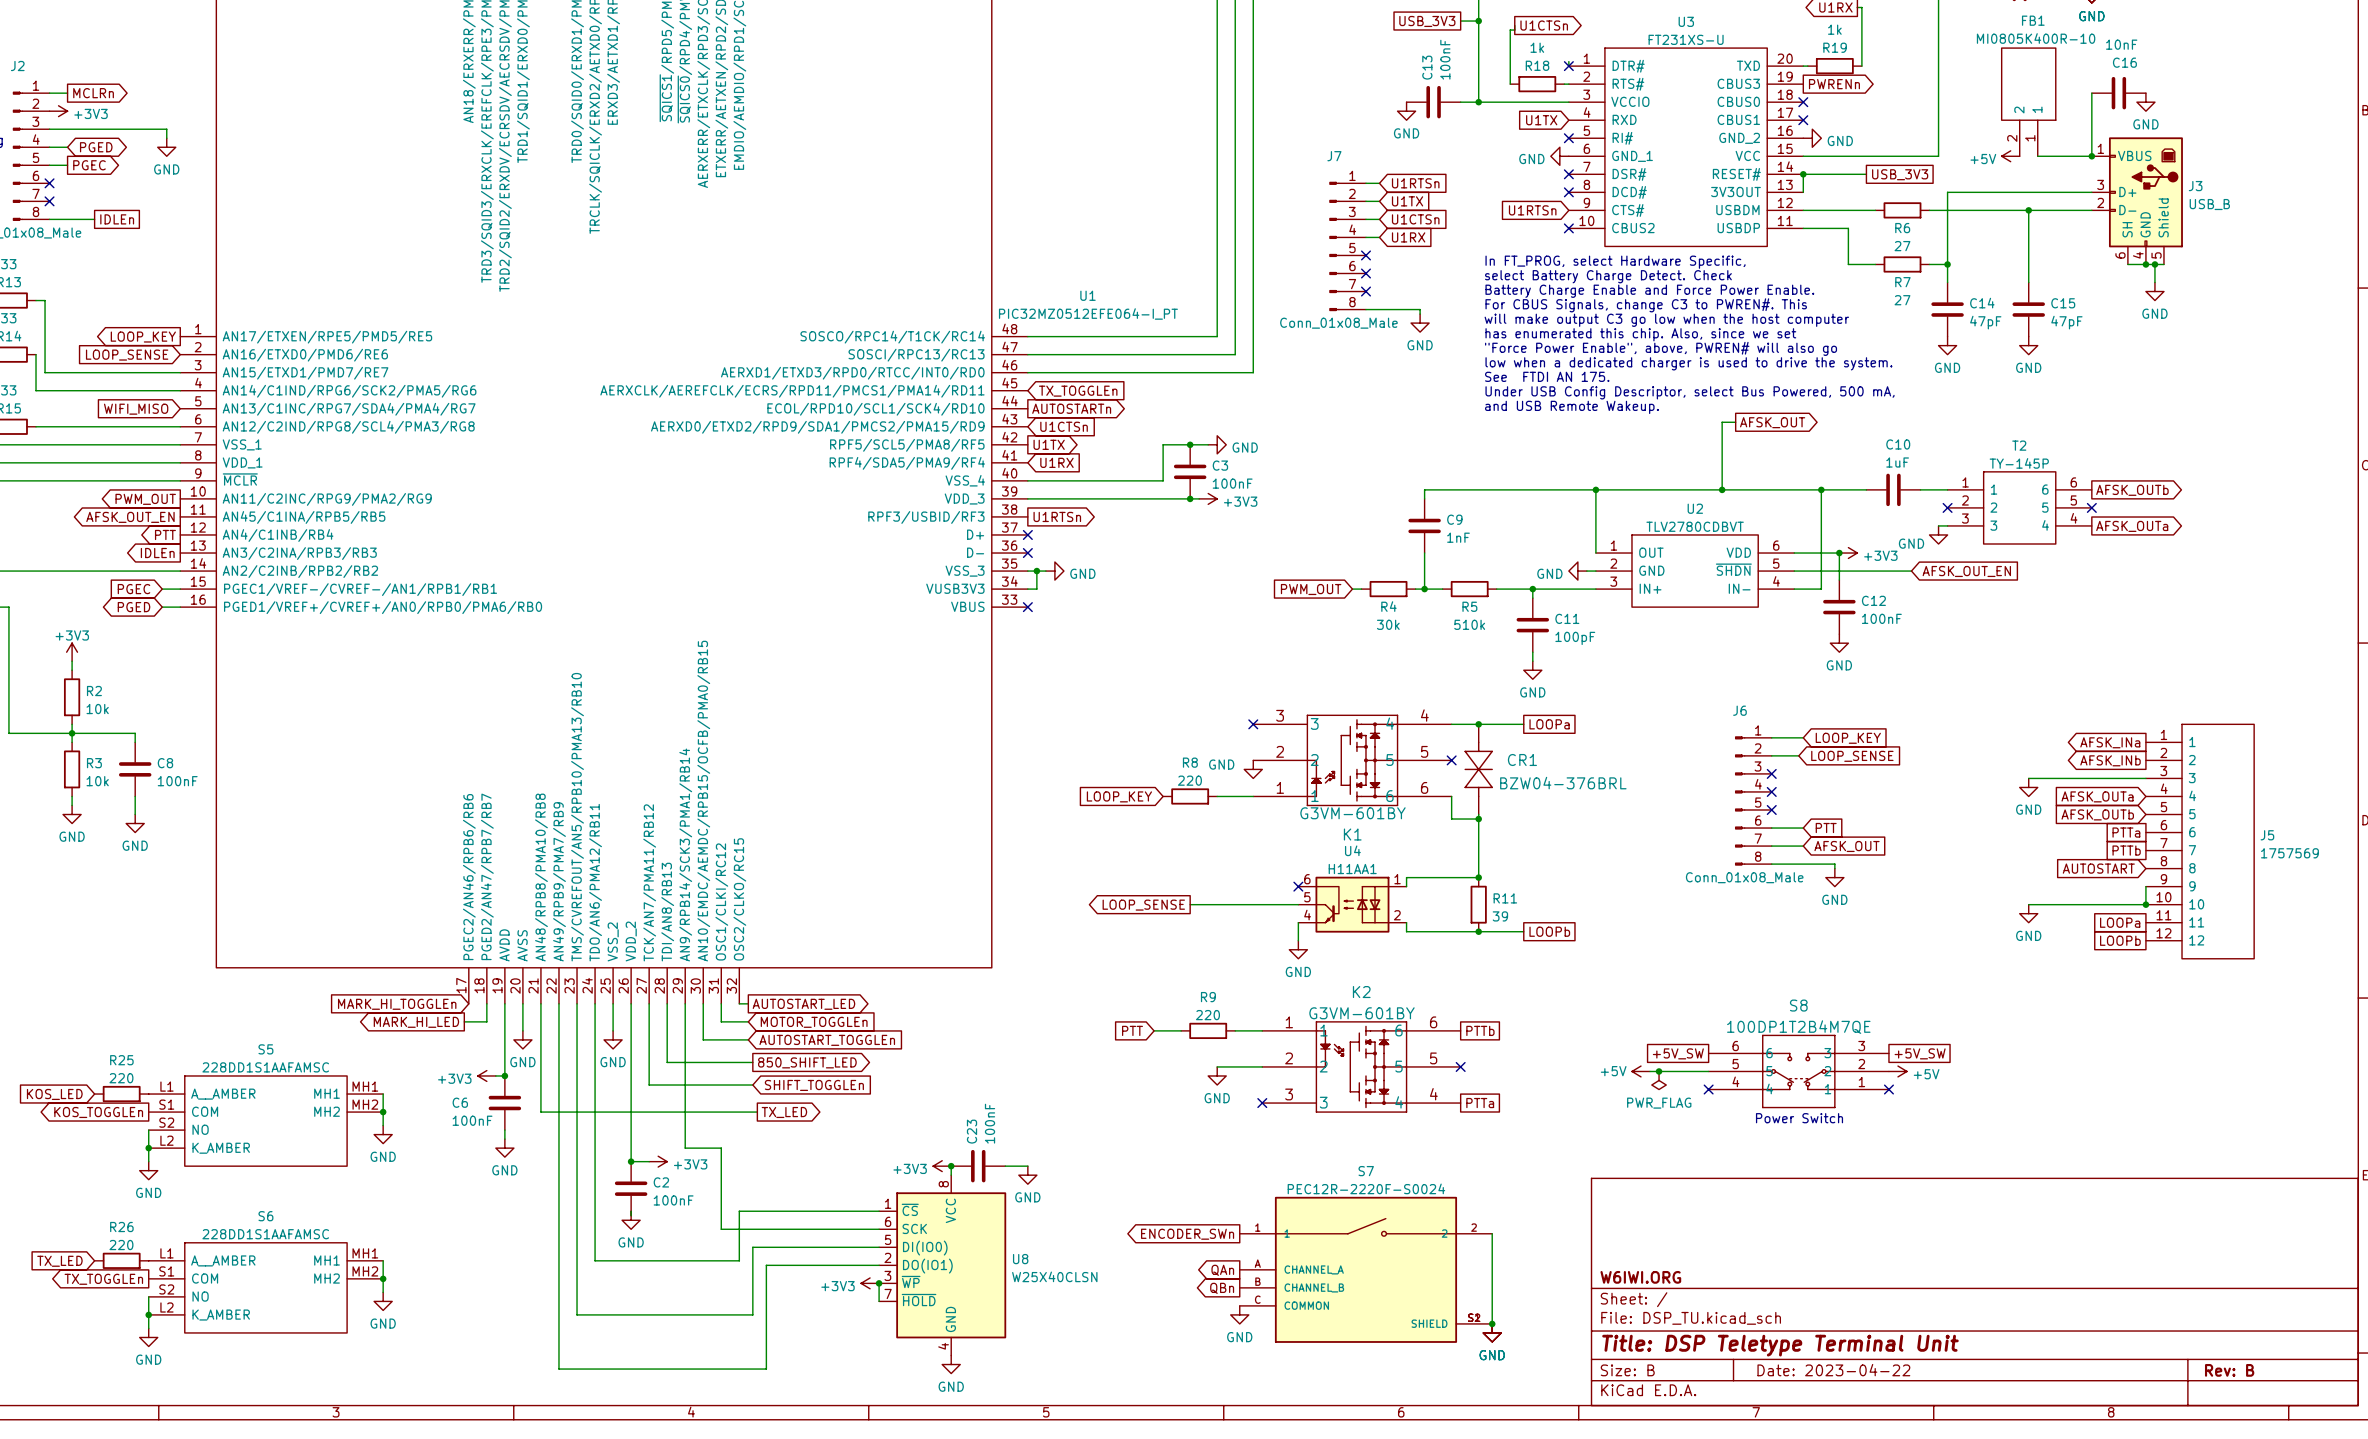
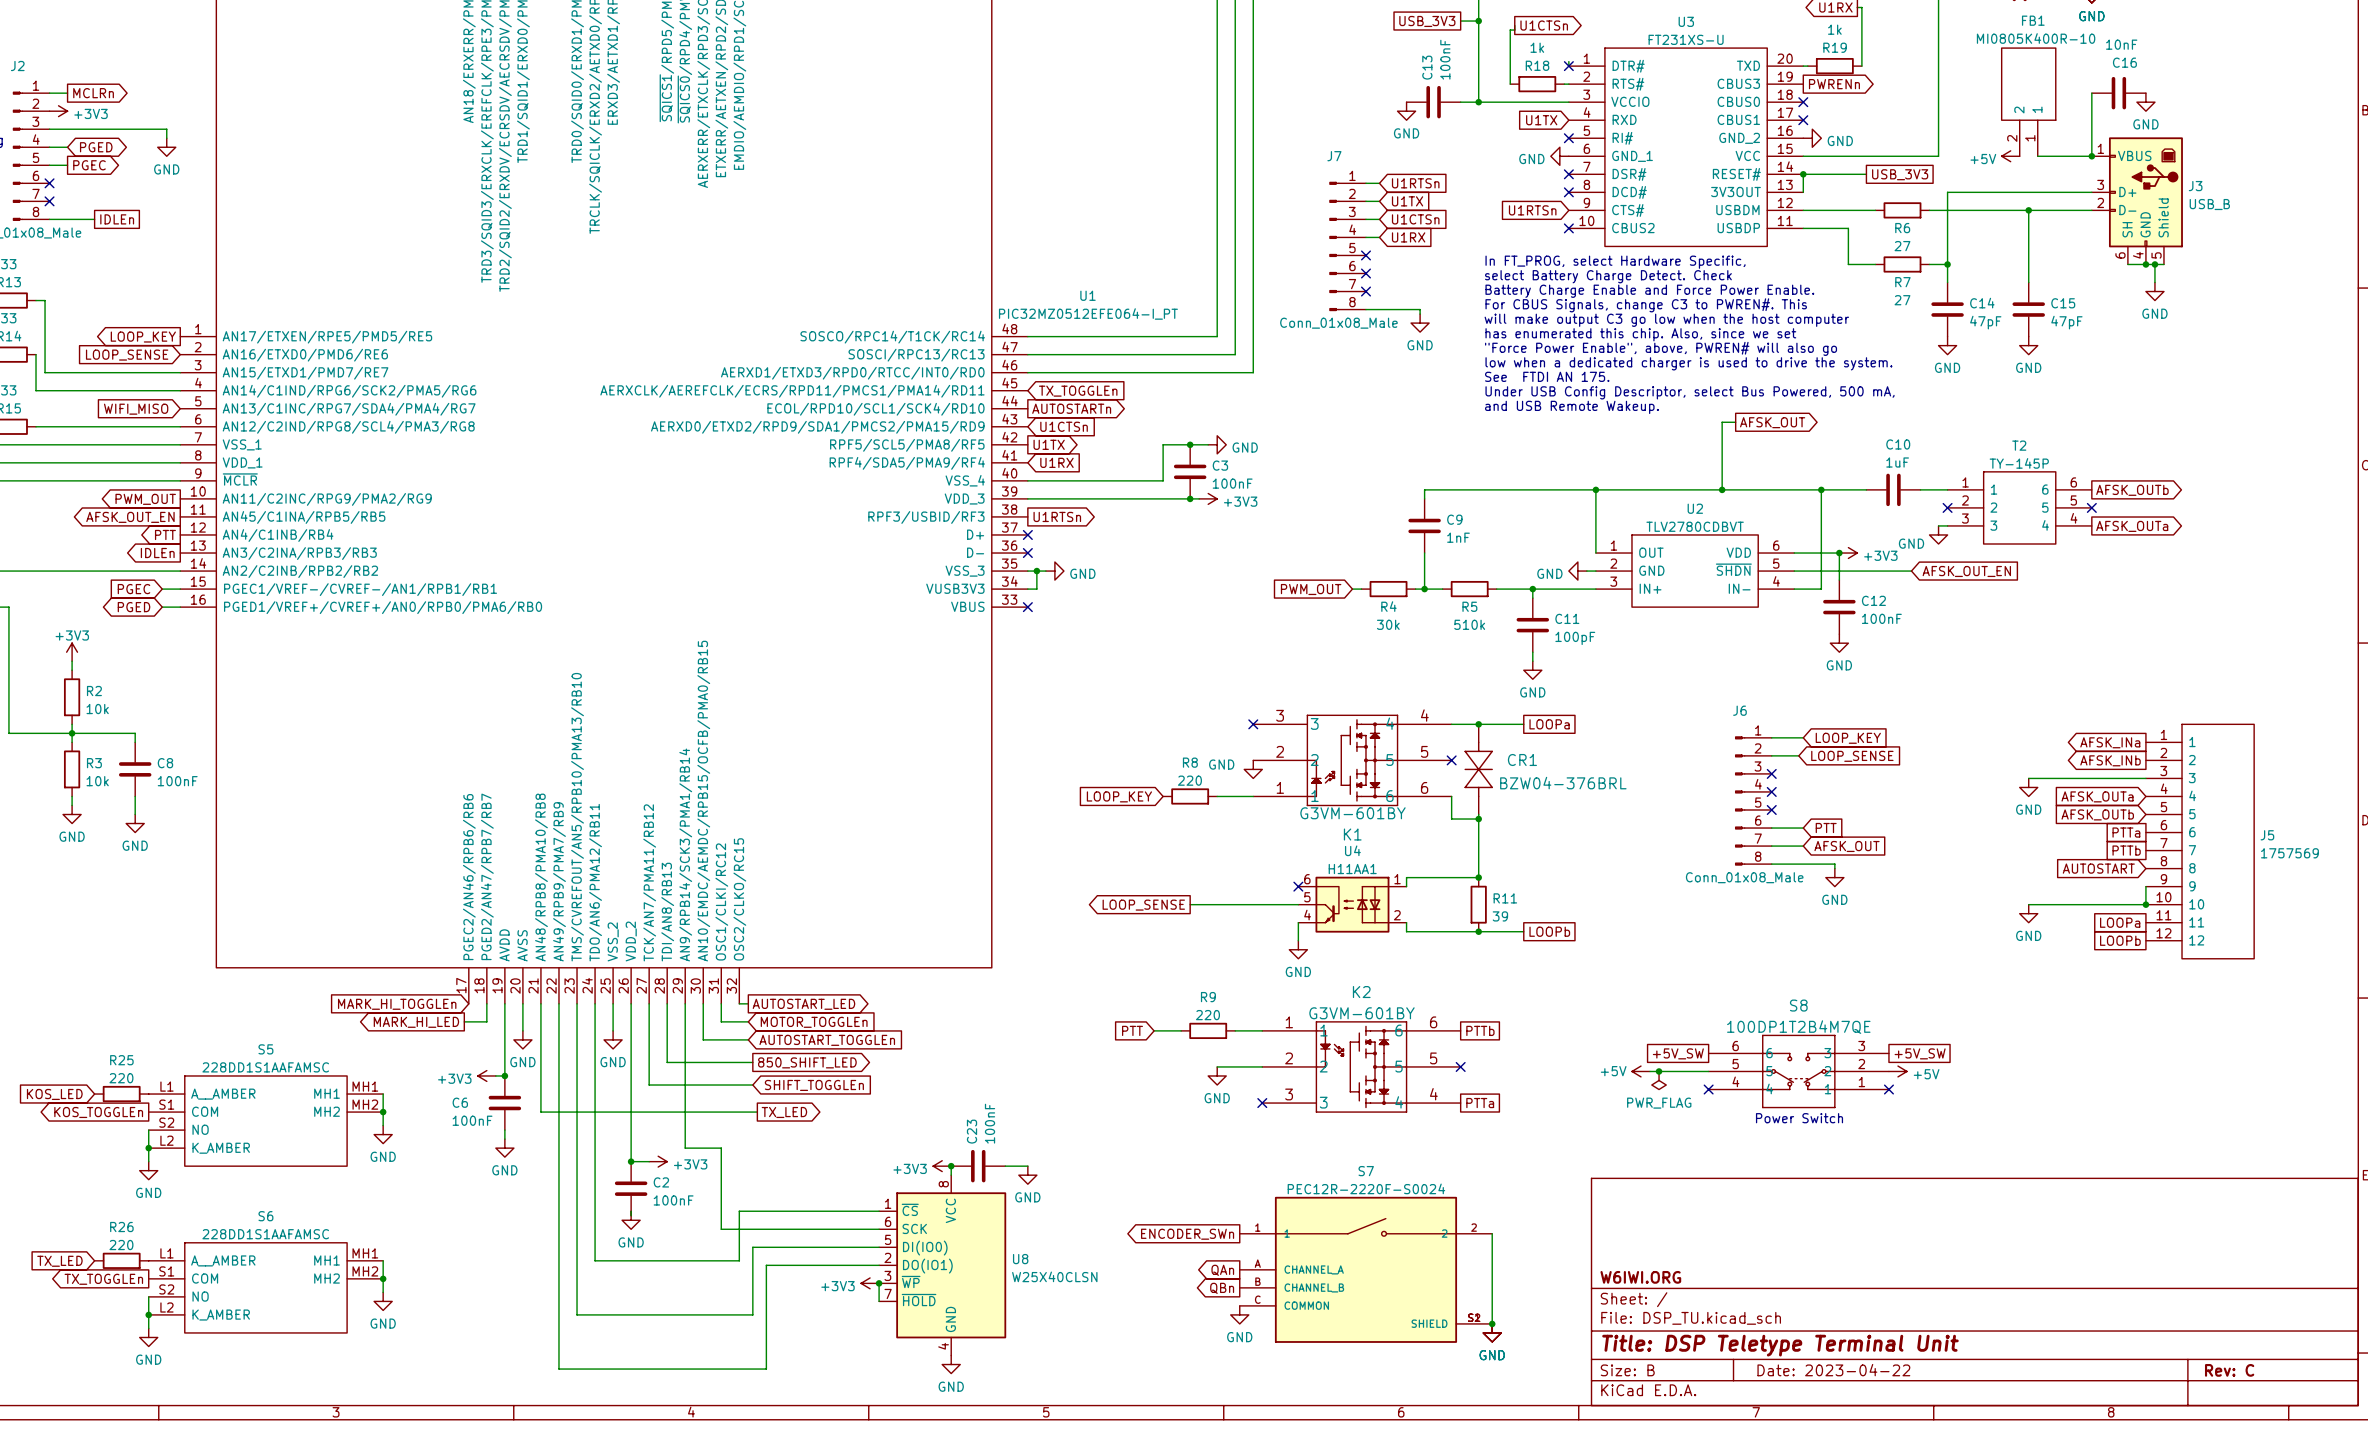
title block: Rev: B (2229, 1370) -> Rev: C (2229, 1370)

